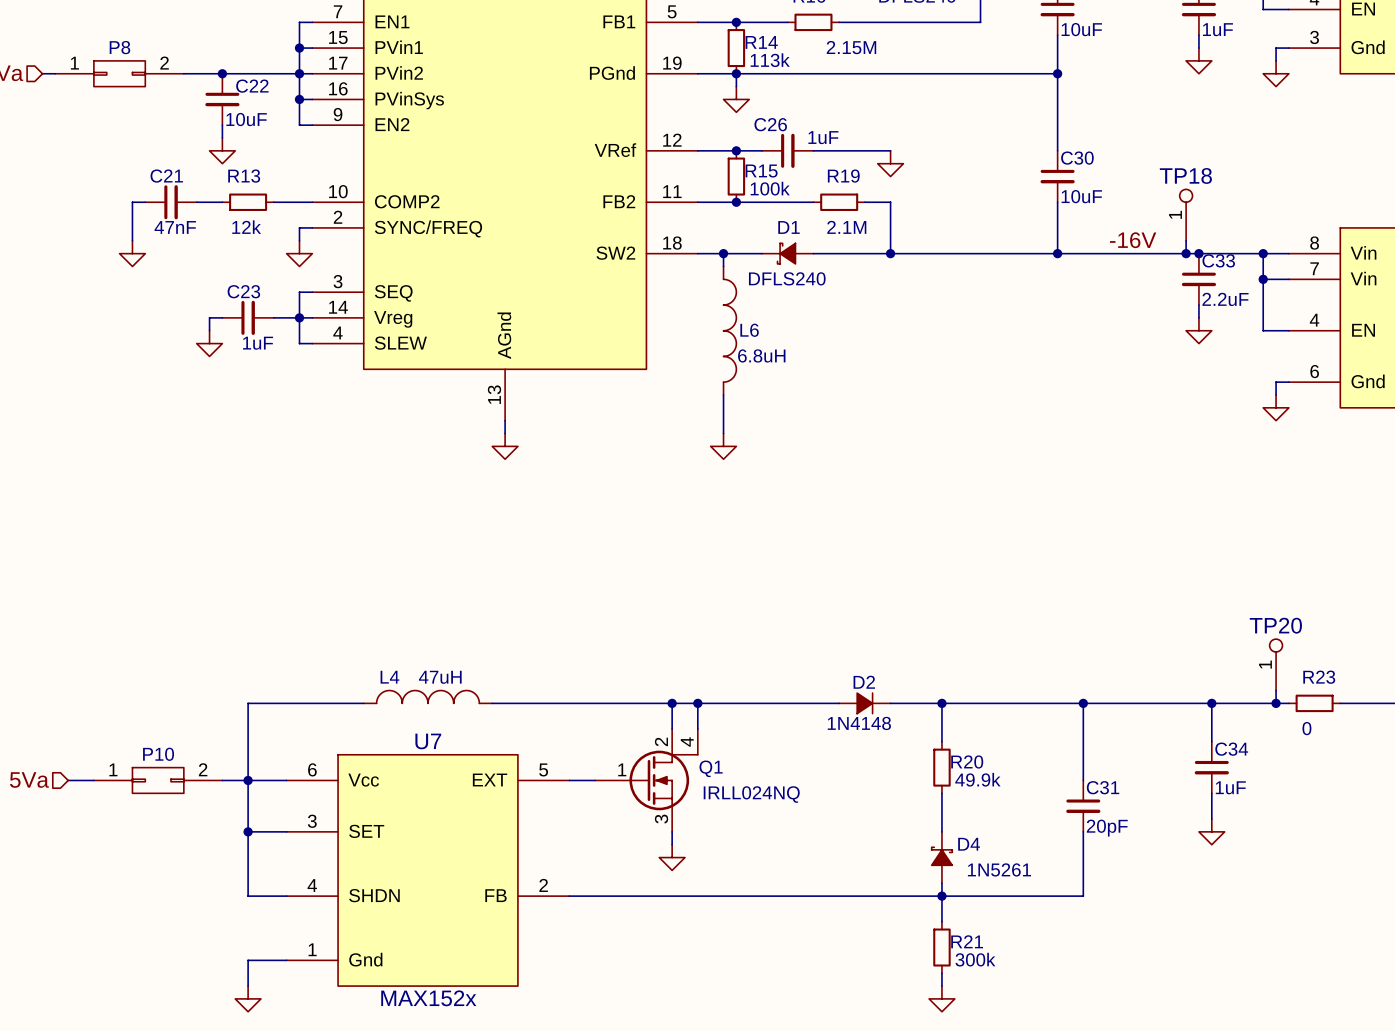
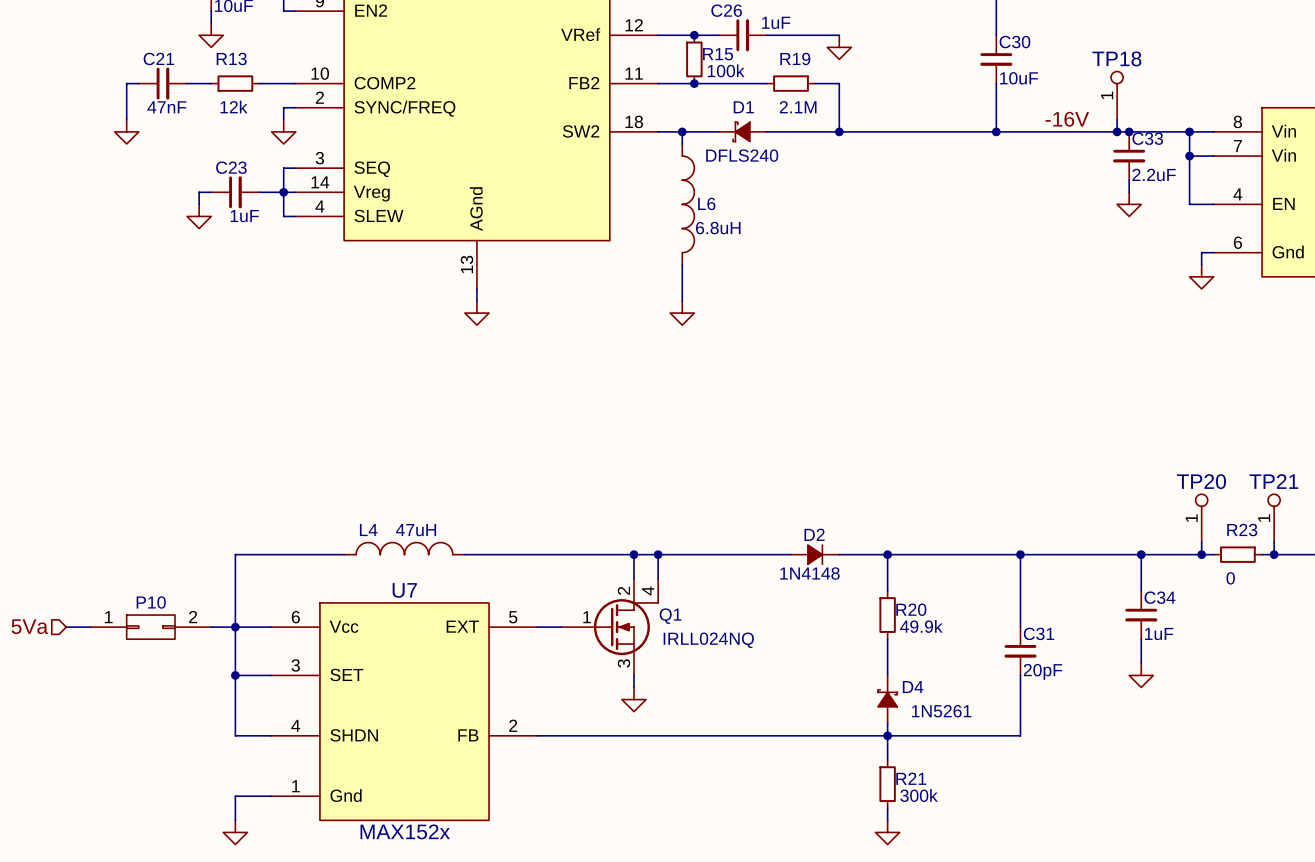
TP21: none -> (1274, 518)
wire: none -> (1274, 542) (1274, 554)
junction: none -> (1274, 554)

